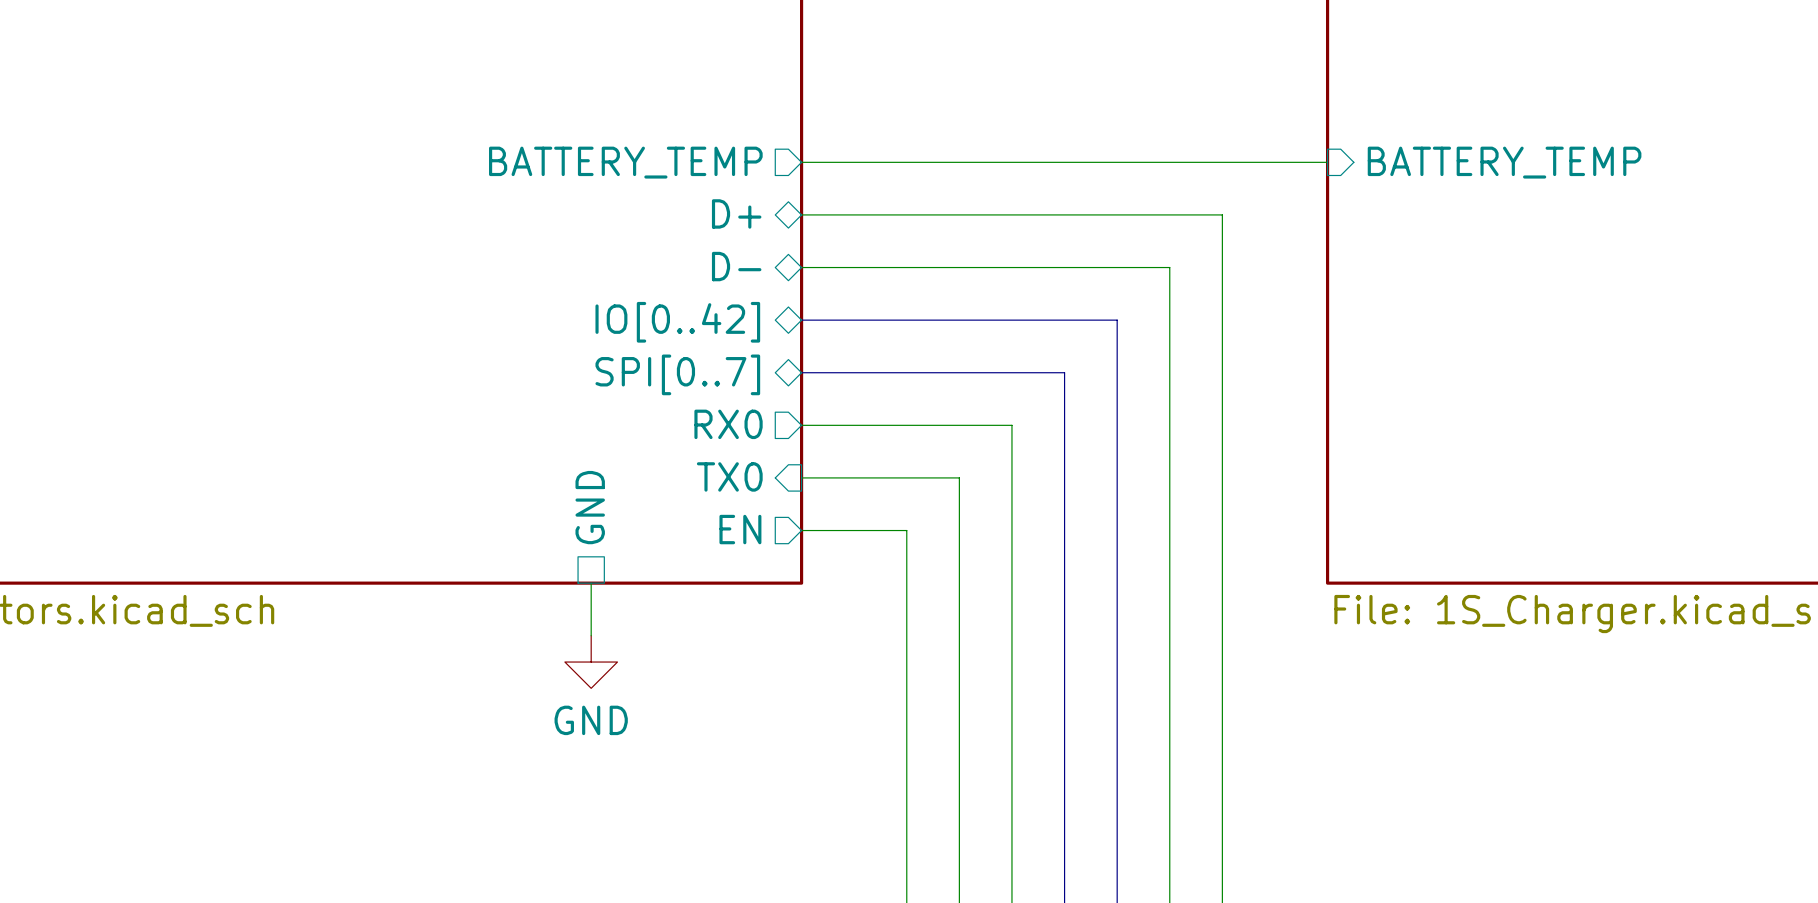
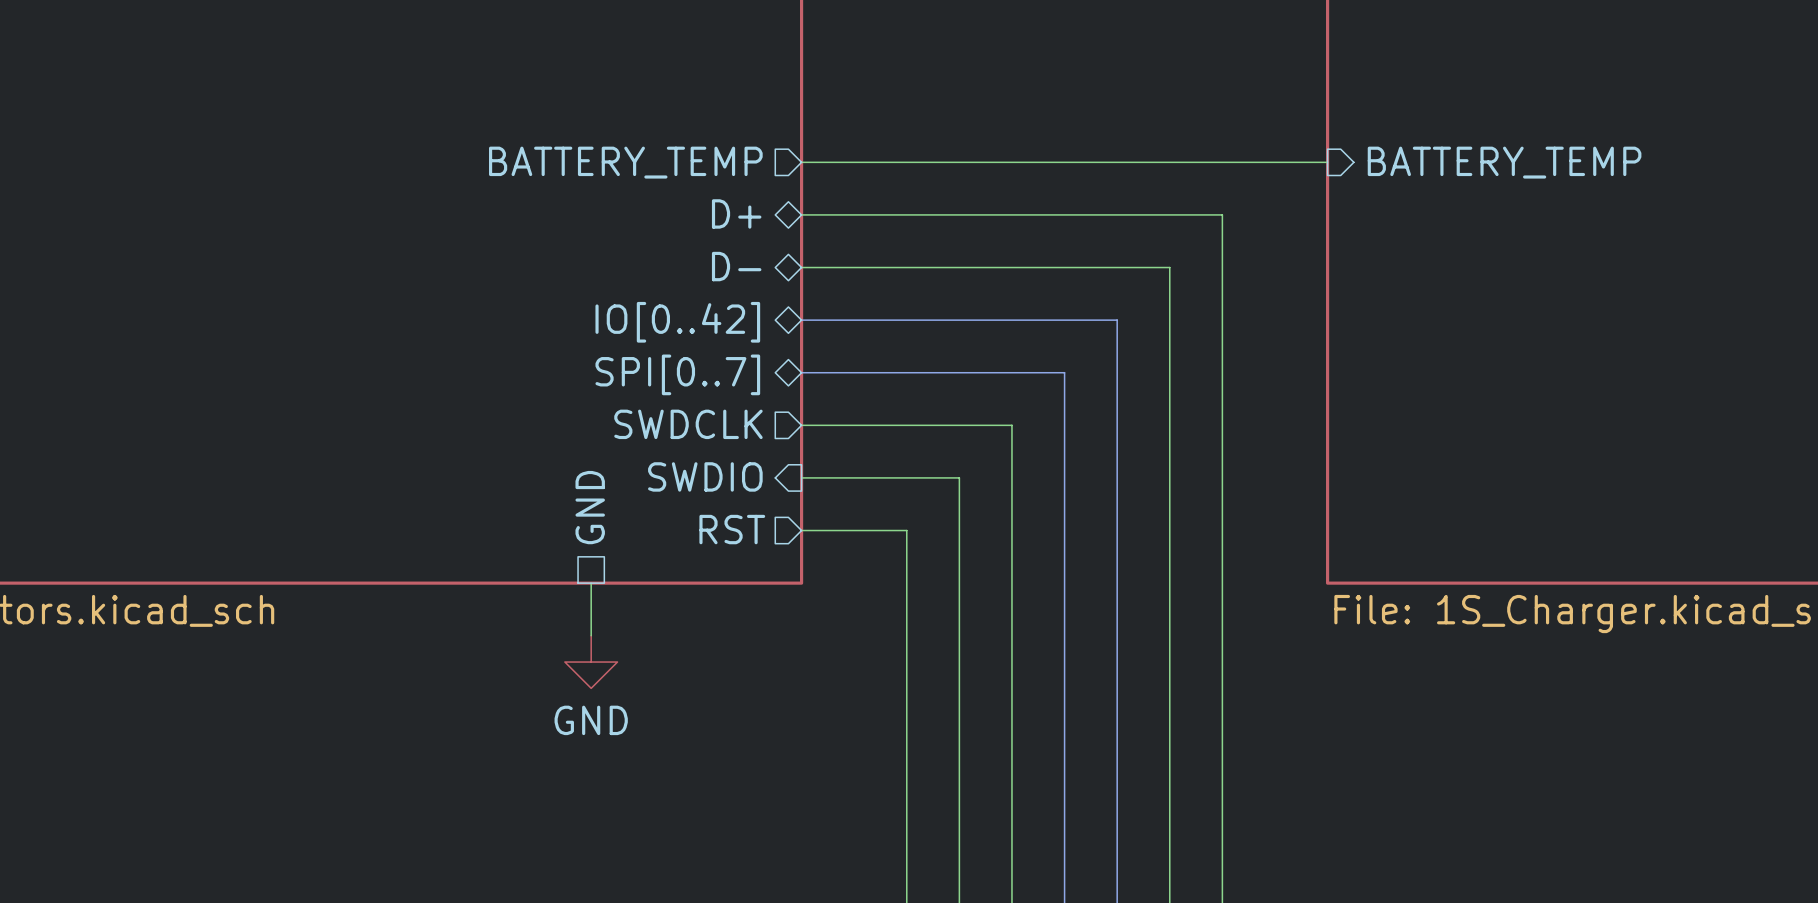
sheet pin: RX0 (728, 424) -> SWDCLK (688, 424)
sheet pin: TX0 (729, 476) -> SWDIO (705, 476)
sheet pin: EN (740, 529) -> RST (732, 529)

